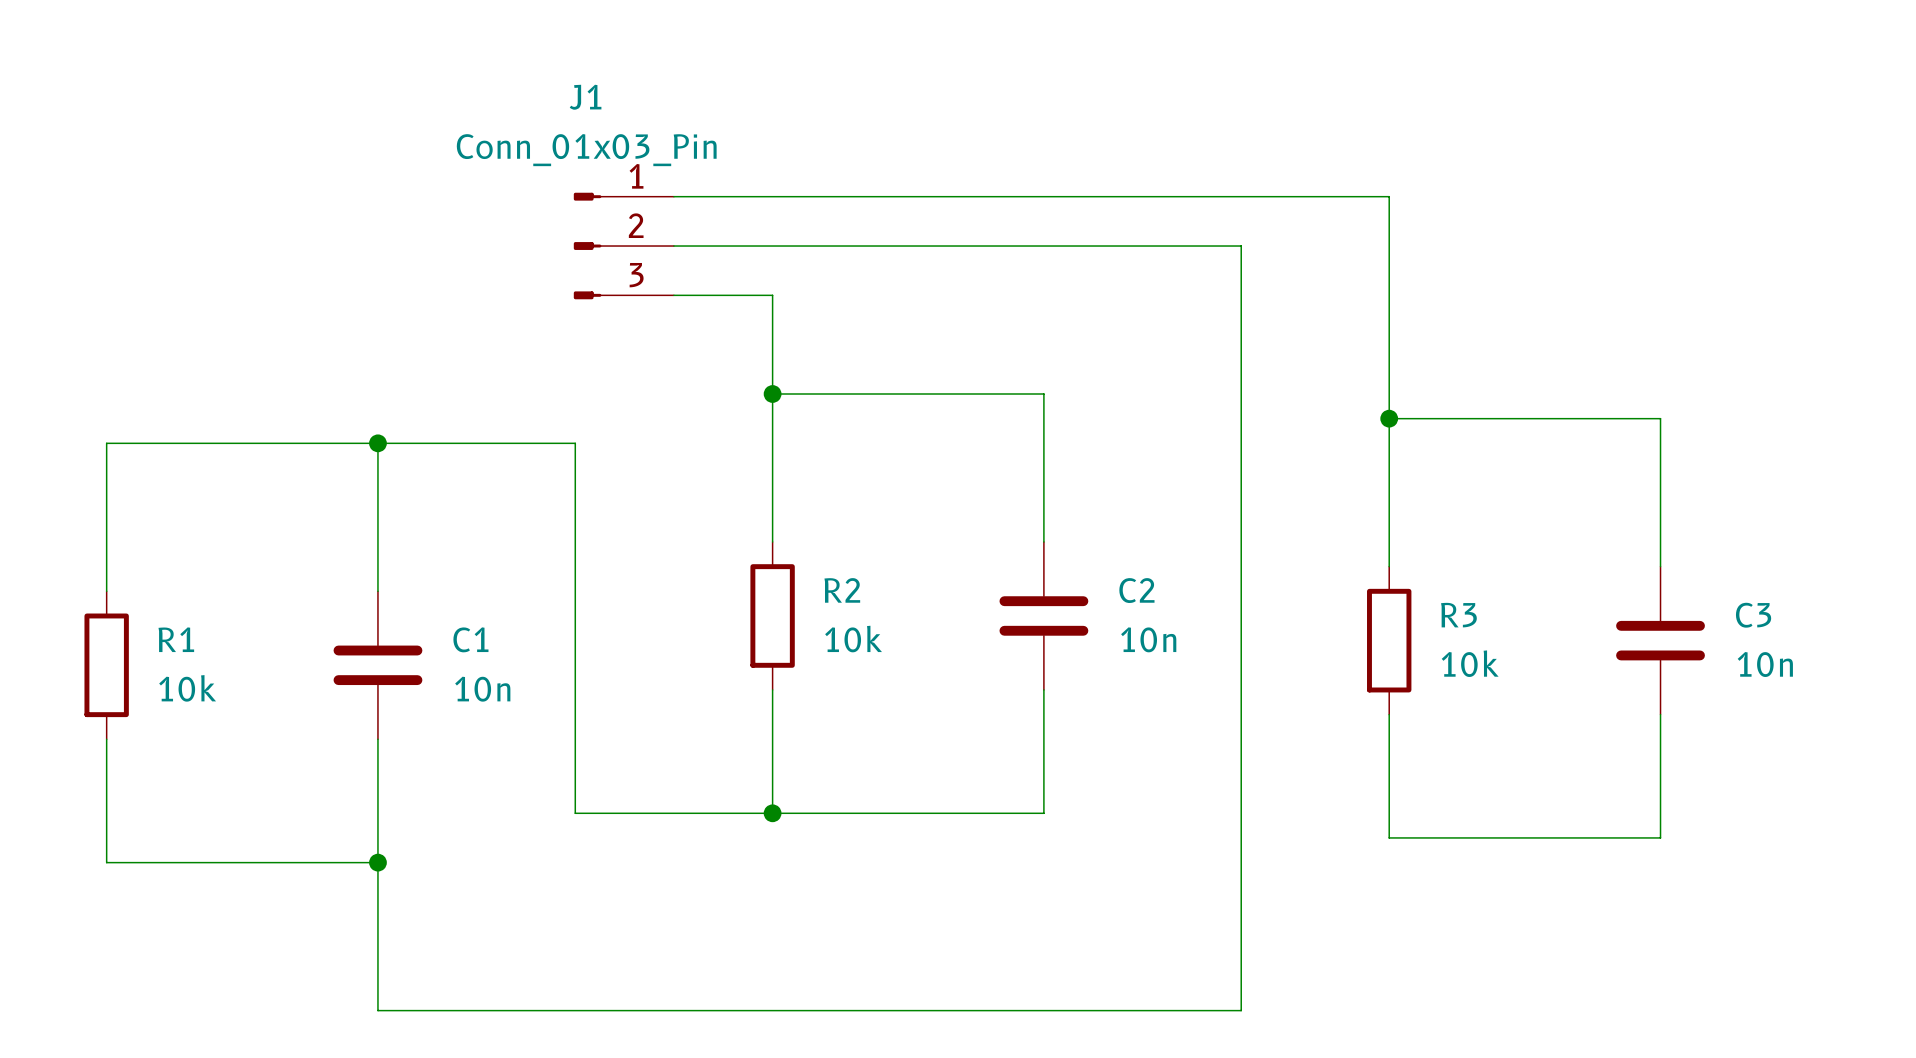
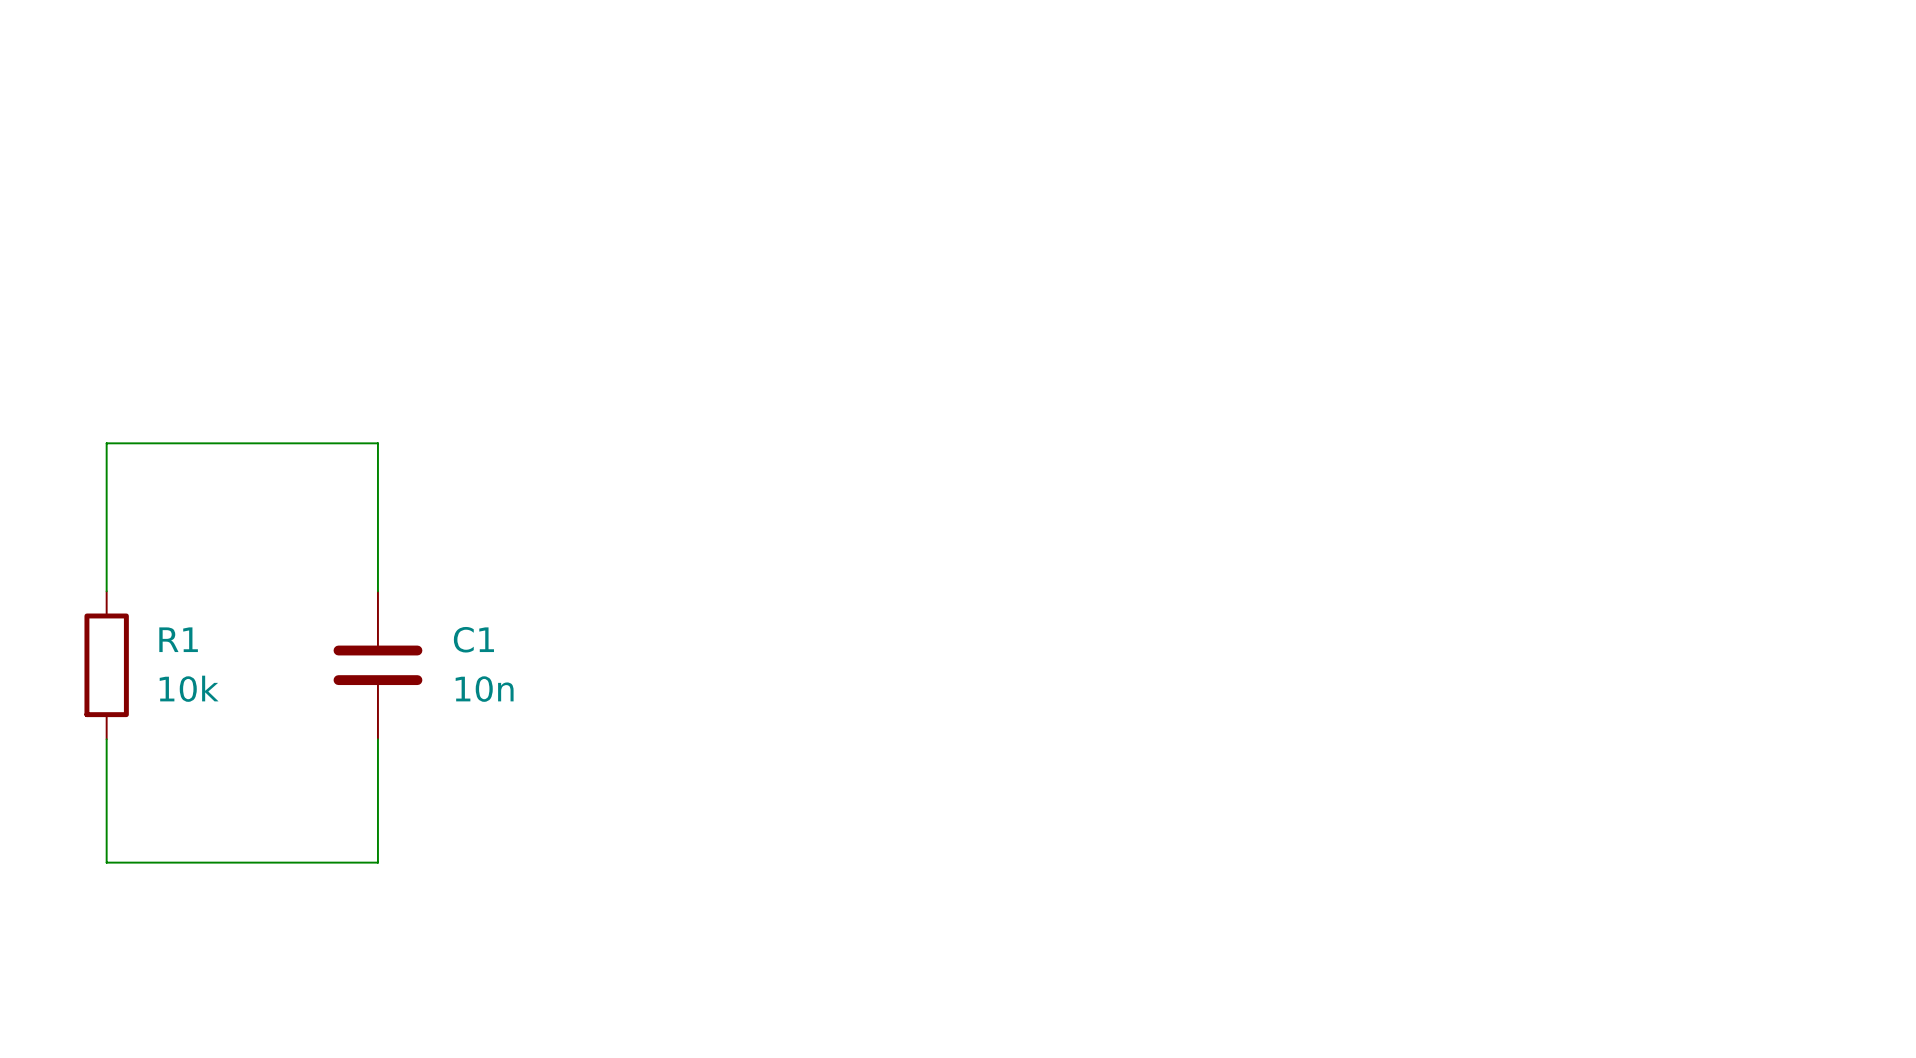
wire: (673, 196) (1389, 196) (1389, 566) -> none
J1: Conn_01x03_Pin (623, 246) -> none
wire: (673, 246) (1241, 246) (1241, 1010) (377, 1010) (377, 862) -> none
wire: (673, 295) (772, 295) (772, 541) -> none
wire: (772, 394) (1043, 394) (1043, 541) -> none
junction: (772, 394) -> none
wire: (1389, 418) (1660, 418) (1660, 566) -> none
junction: (1389, 418) -> none
wire: (377, 443) (575, 443) (575, 813) (1043, 813) (1043, 689) -> none
junction: (377, 443) -> none
R2: 10k (772, 615) -> none
C2: 10n (1043, 615) -> none
R3: 10k (1389, 640) -> none
C3: 10n (1660, 640) -> none
wire: (772, 689) (772, 813) -> none
wire: (1389, 714) (1389, 837) (1660, 837) (1660, 714) -> none
junction: (772, 813) -> none
junction: (377, 862) -> none

